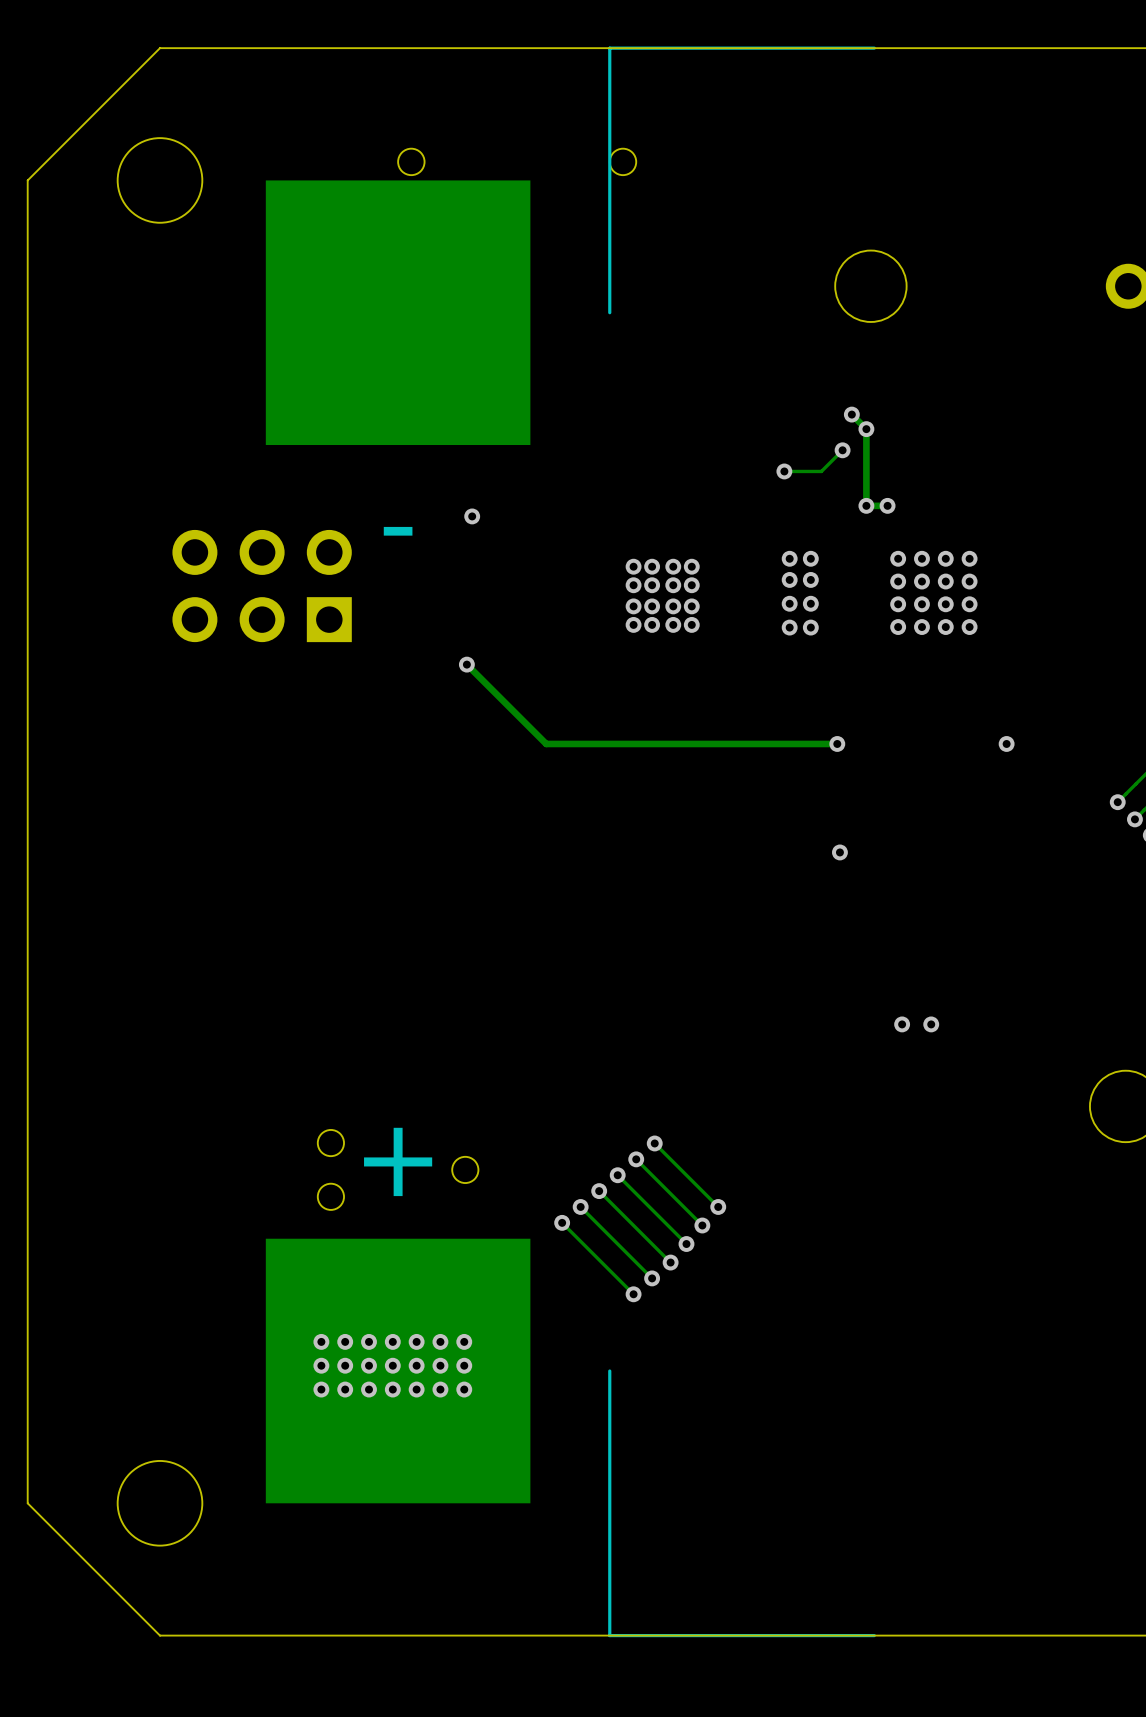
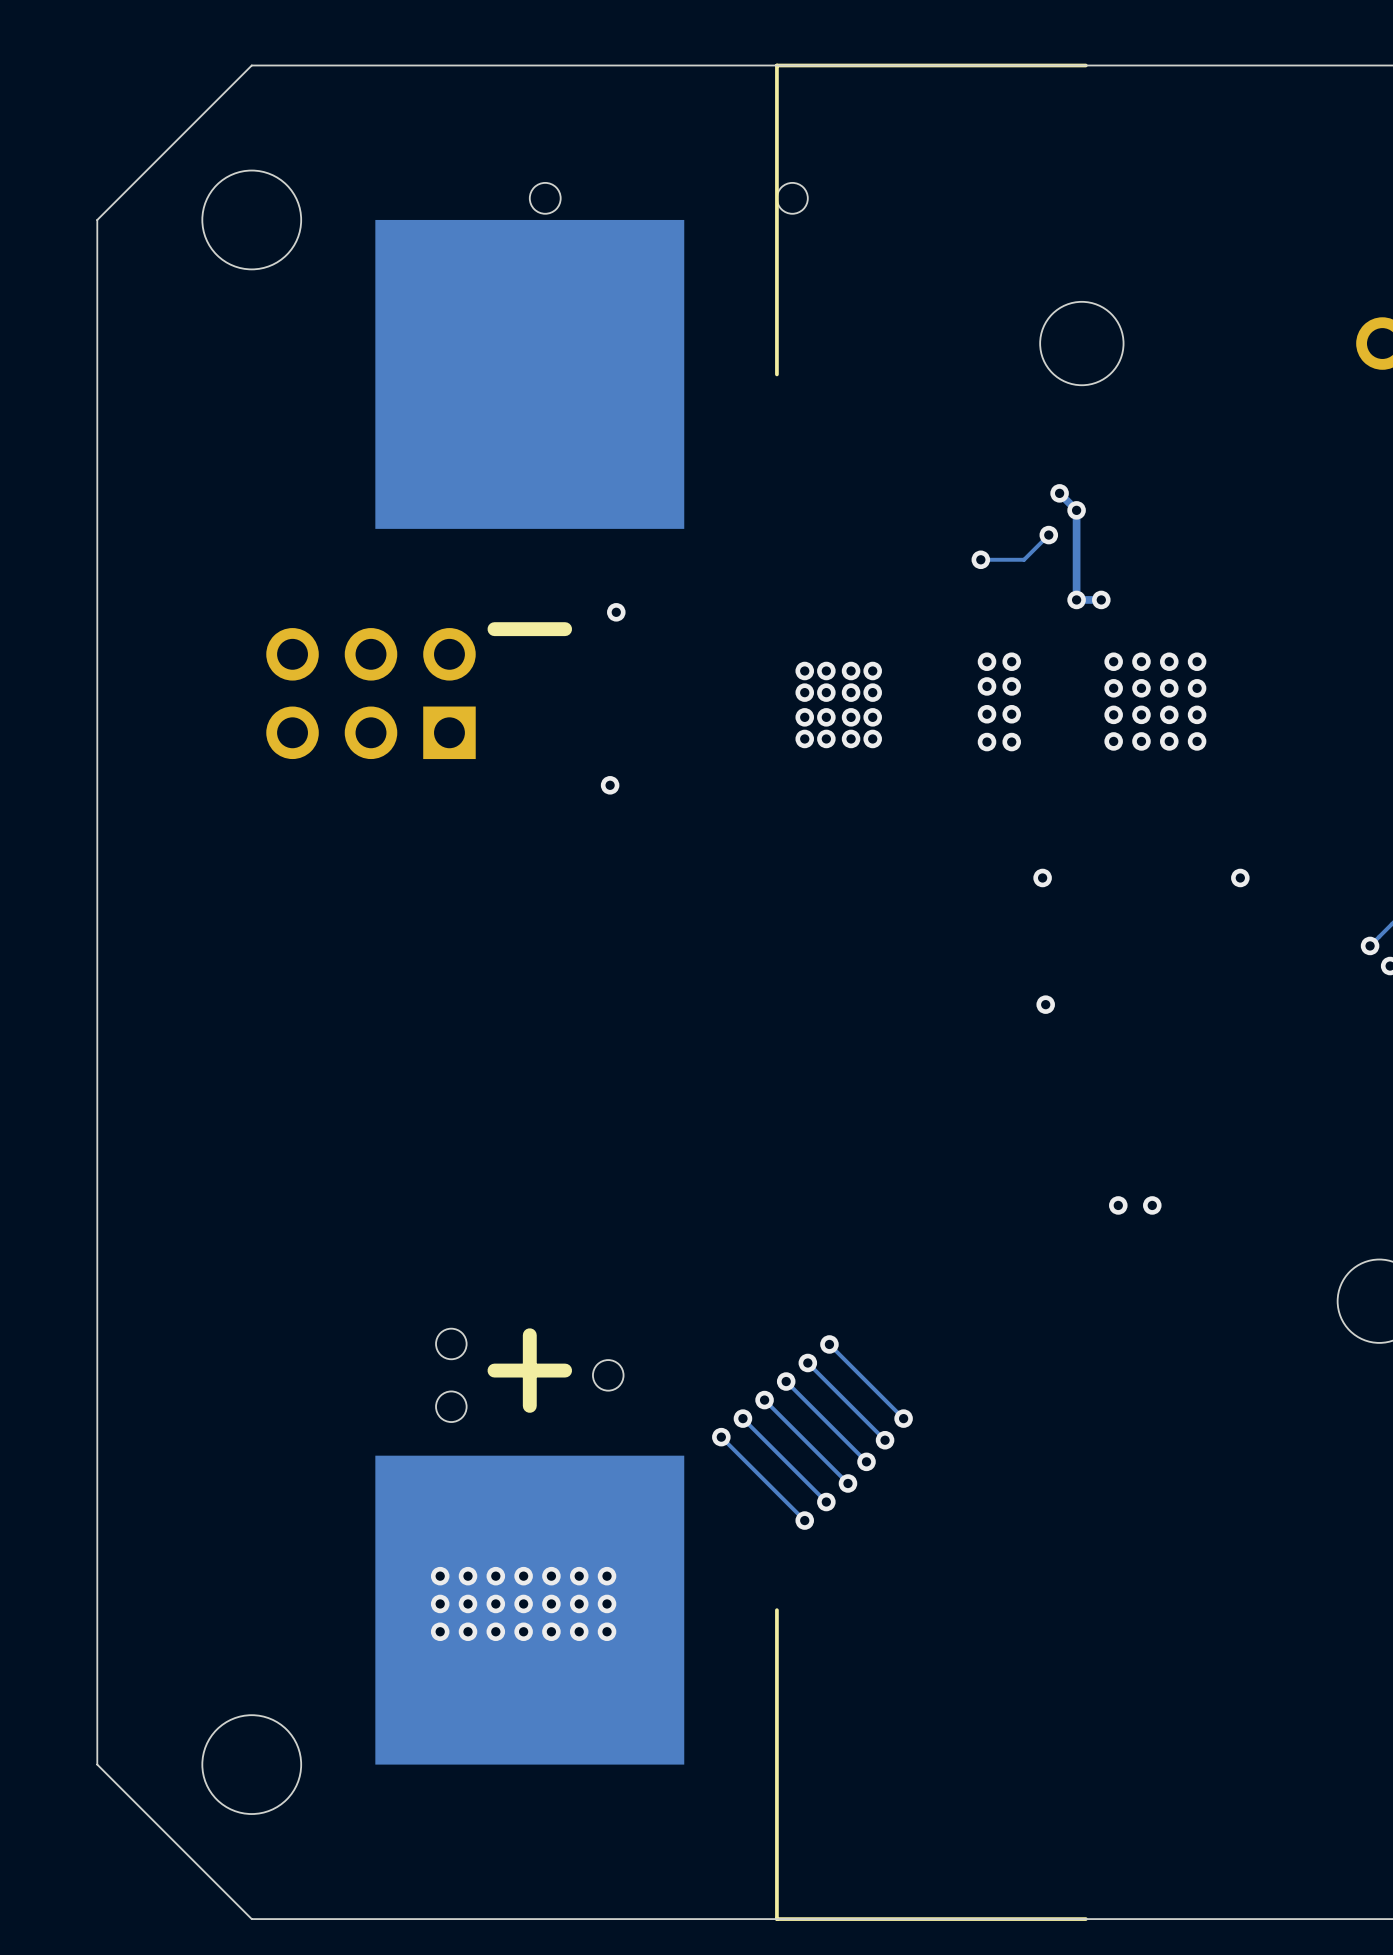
track: (466, 664) (546, 743) (837, 743) -> none

